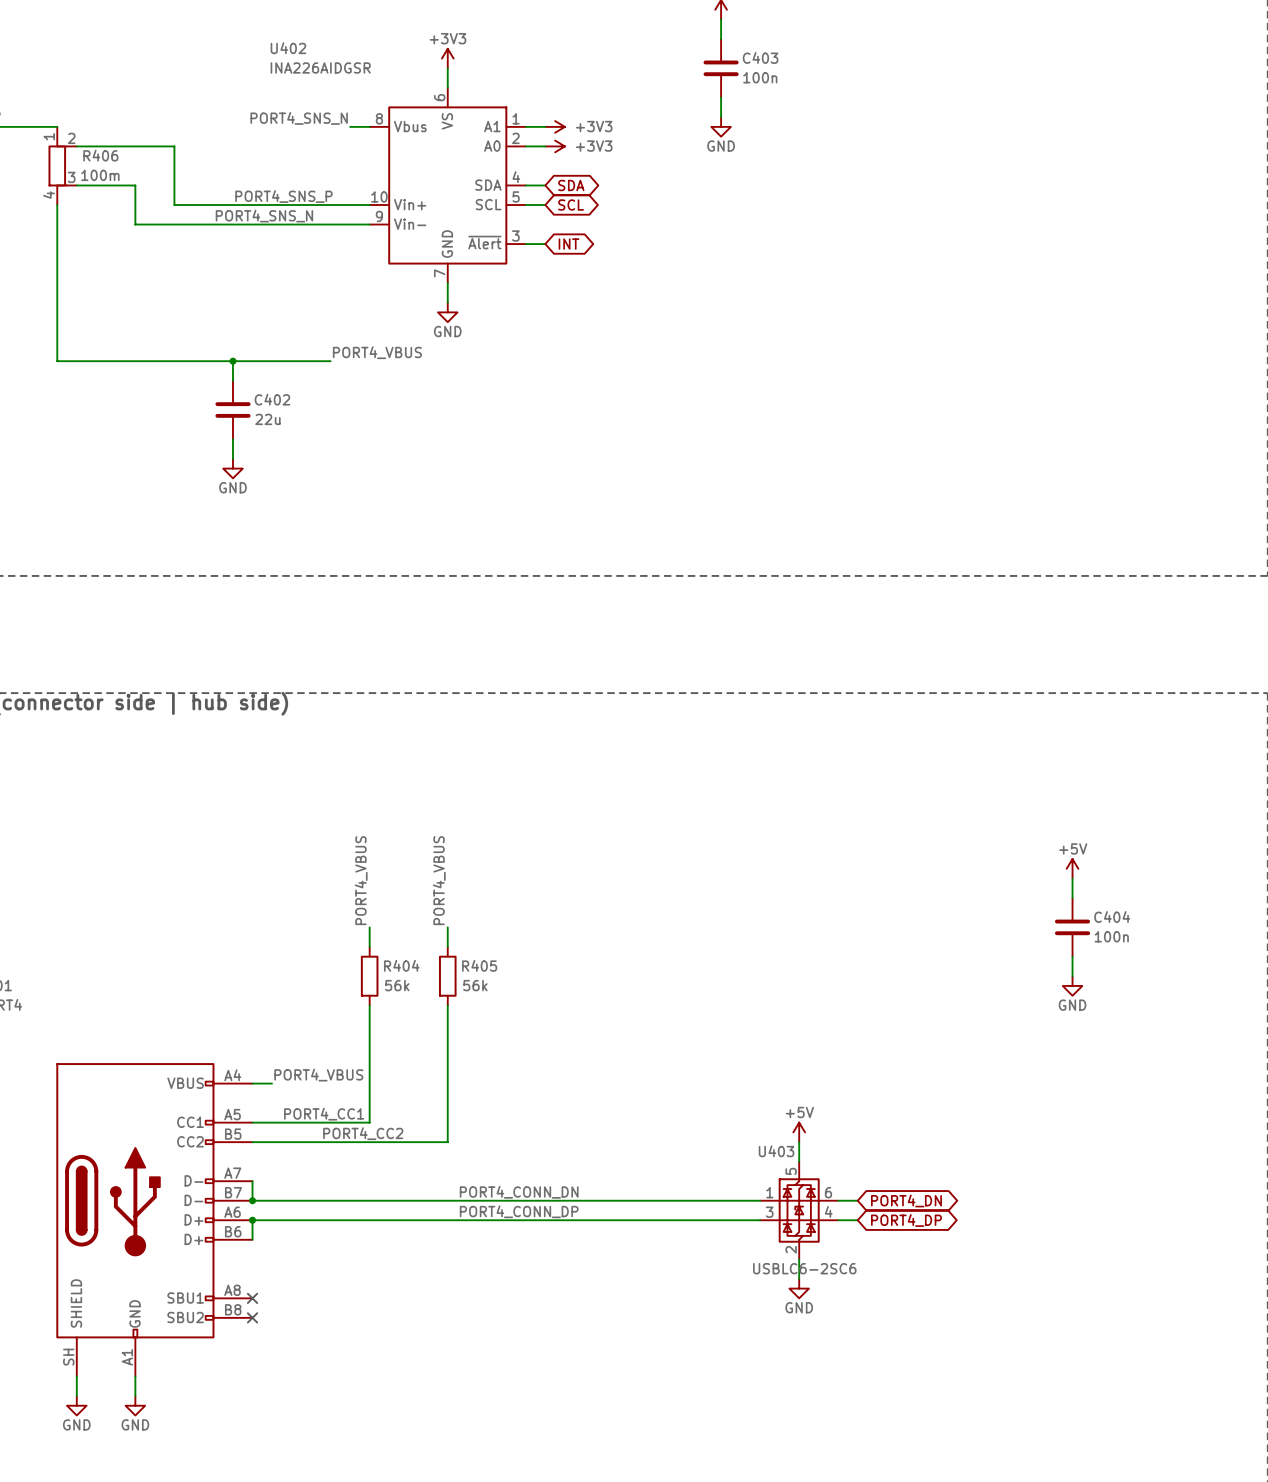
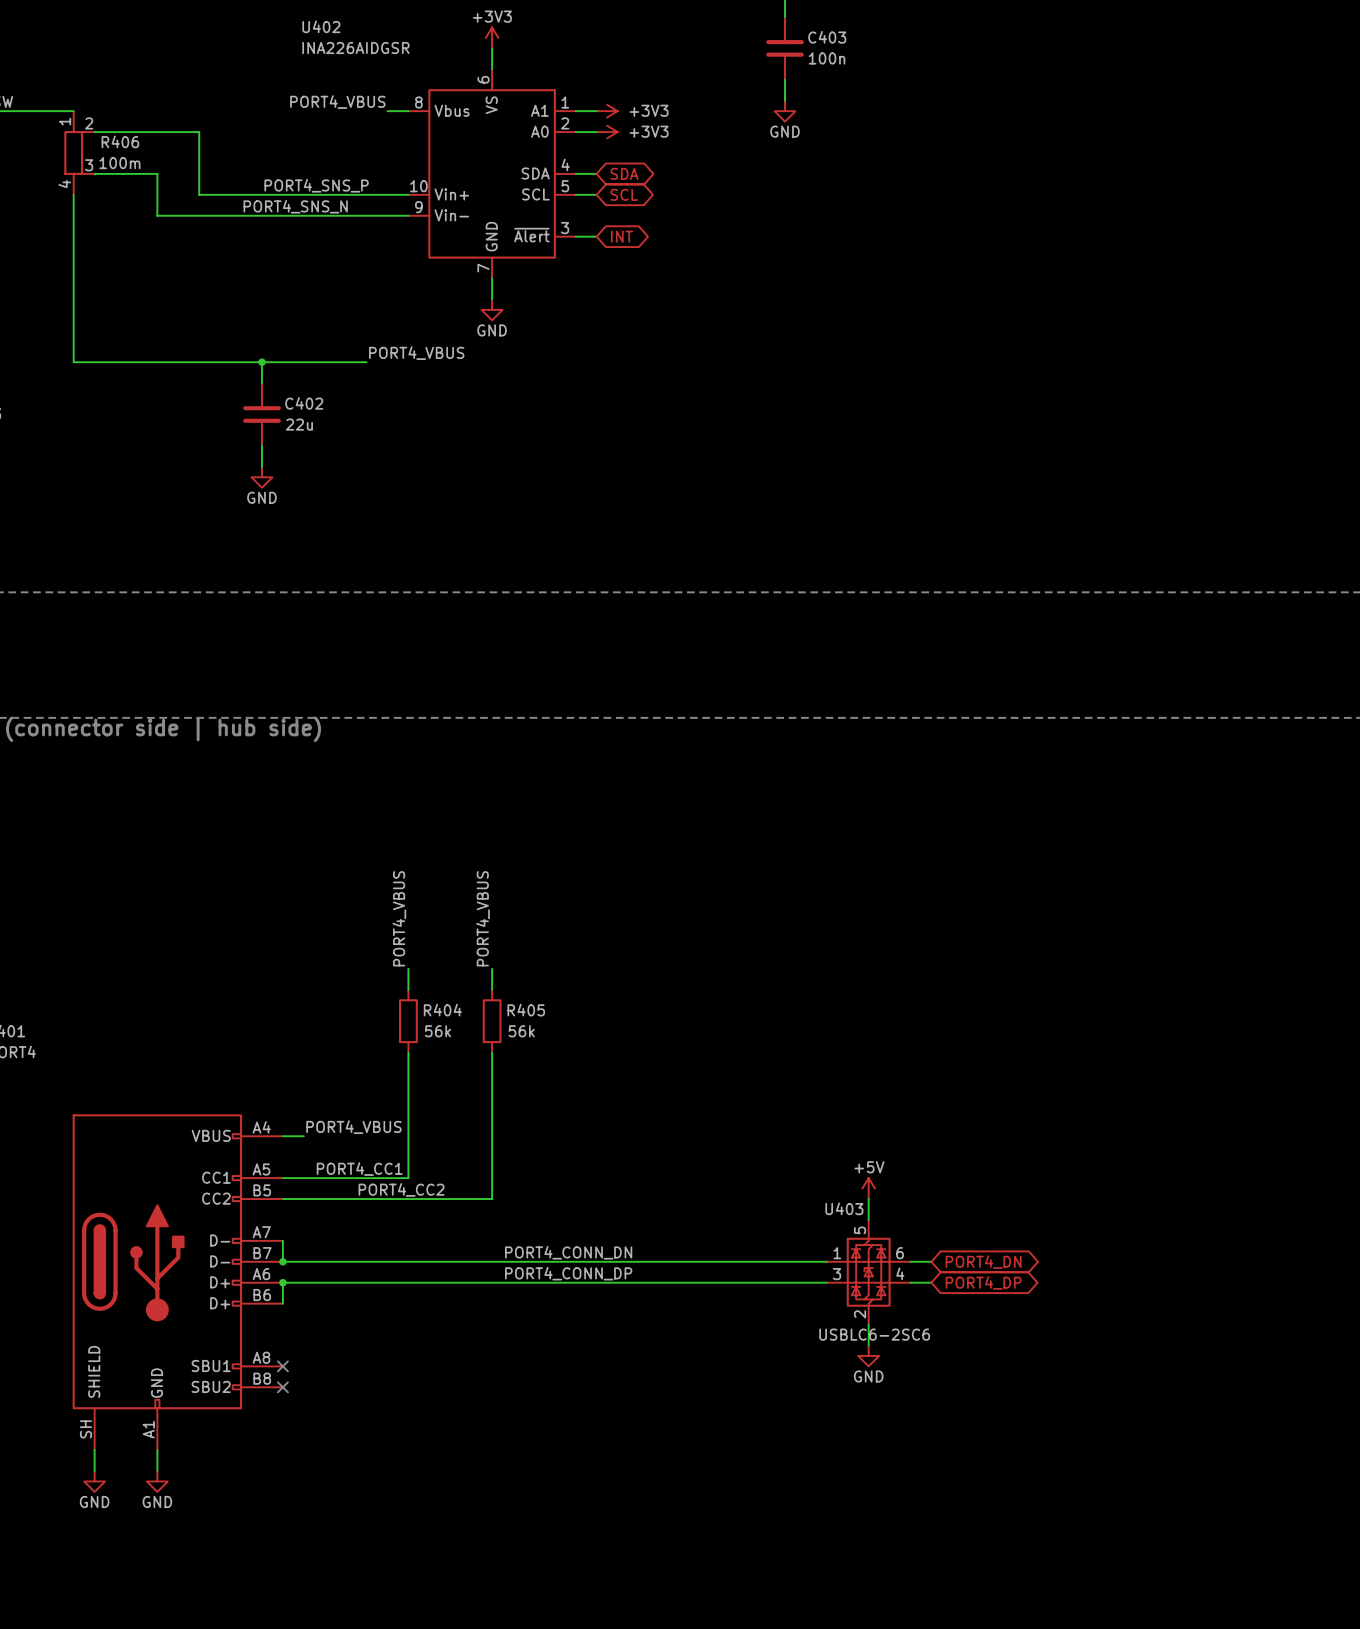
label: PORT4_SNS_N (299, 118) -> PORT4_VBUS (337, 102)
power symbol: +5V (1072, 868) -> none
wire: (1072, 878) (1072, 898) -> none
C404: 100n (1072, 927) -> none
wire: (1072, 956) (1072, 976) -> none
power symbol: GND (1072, 985) -> none

